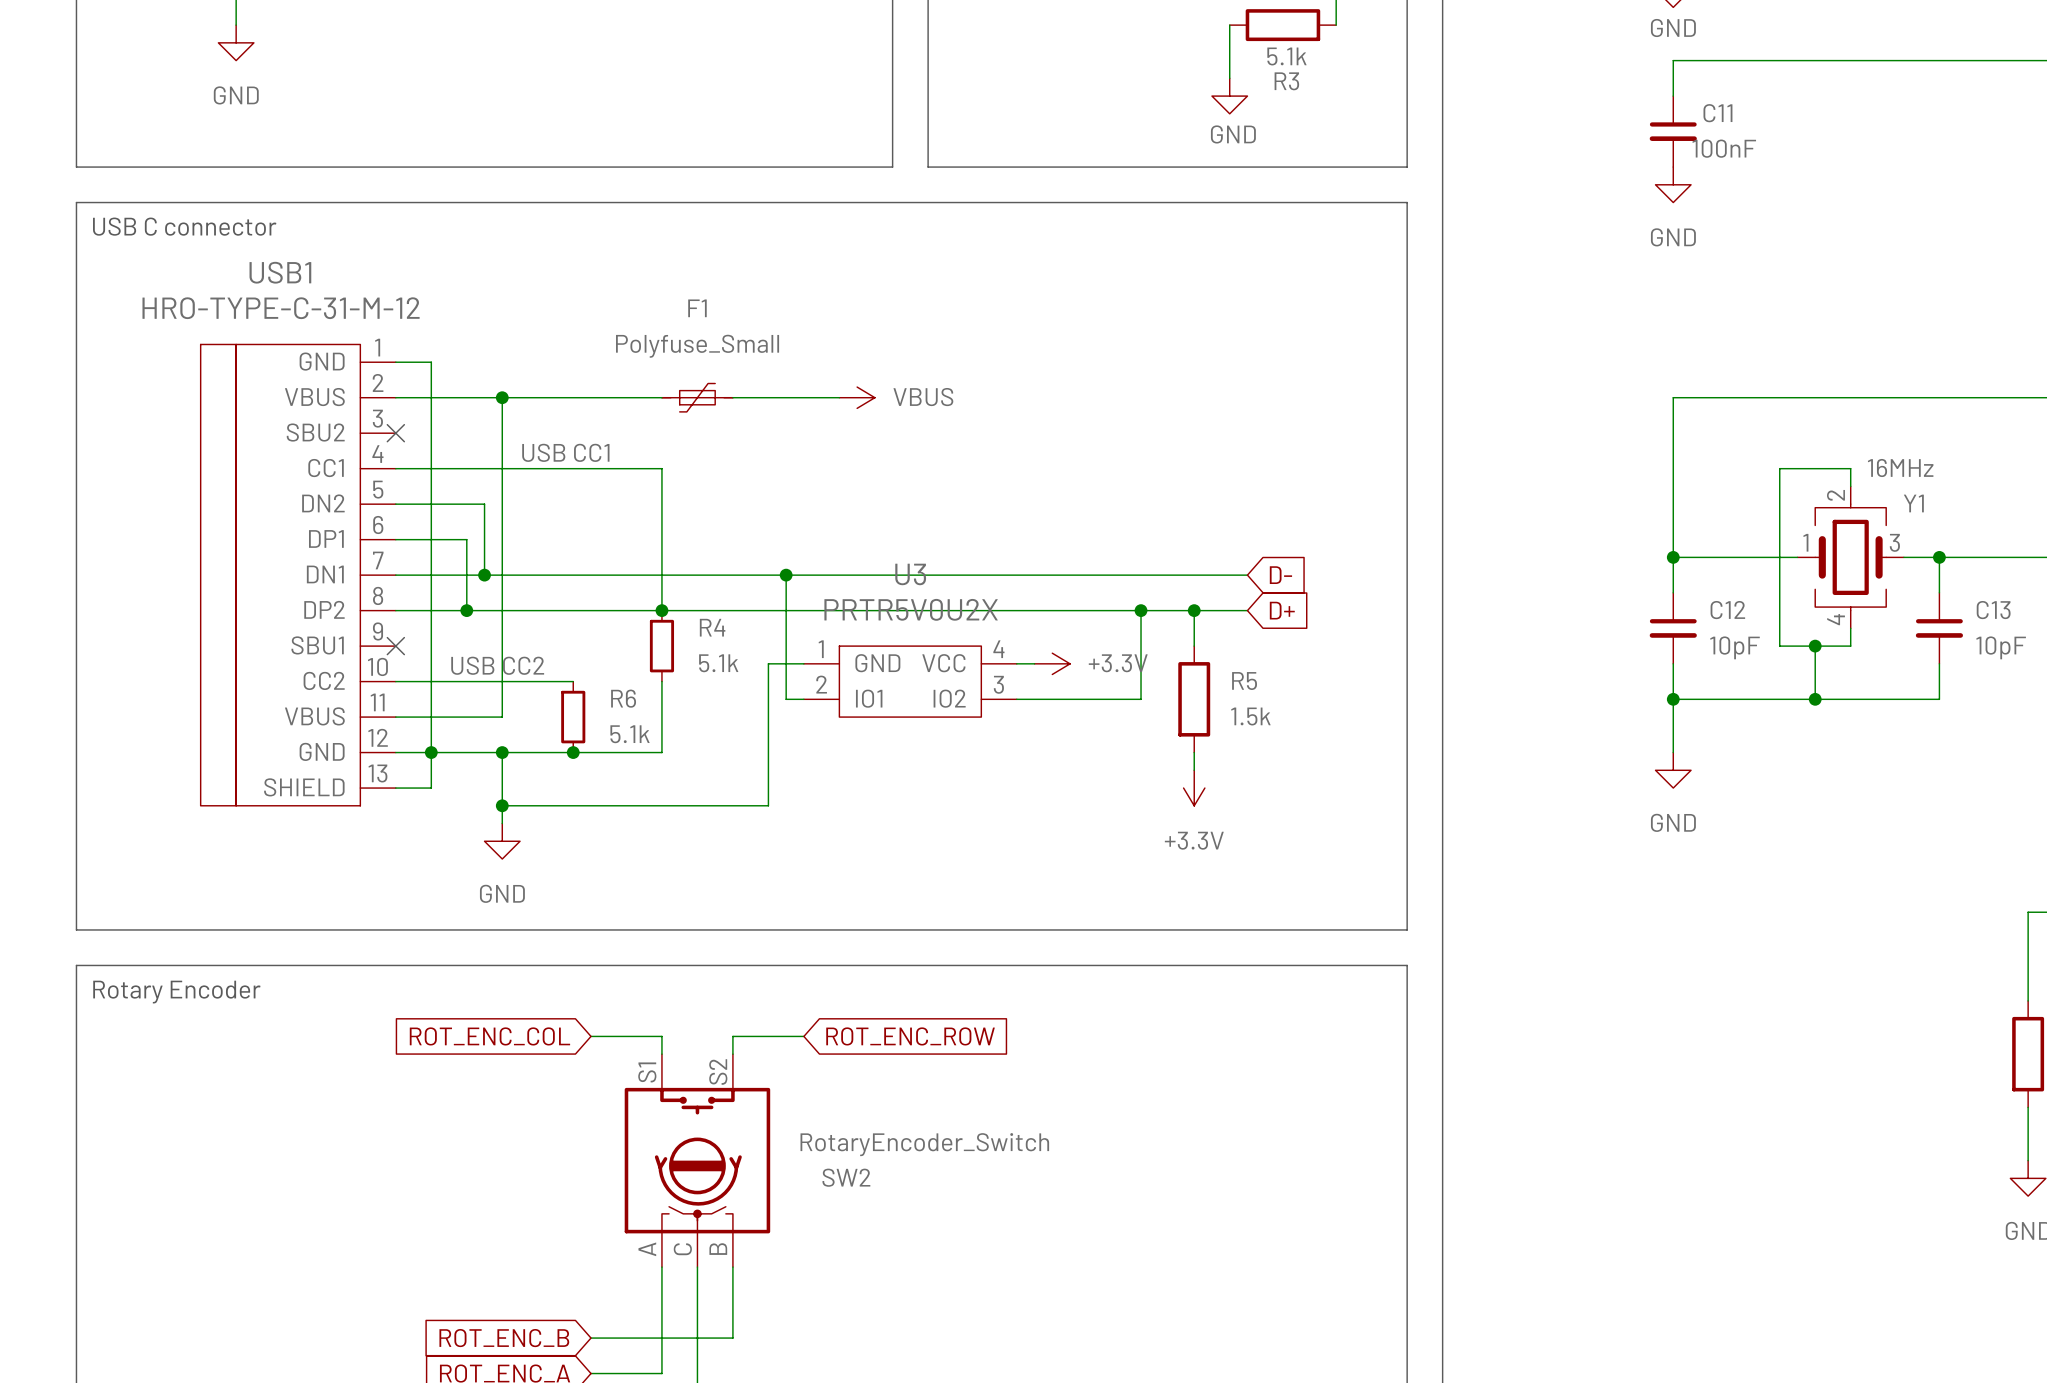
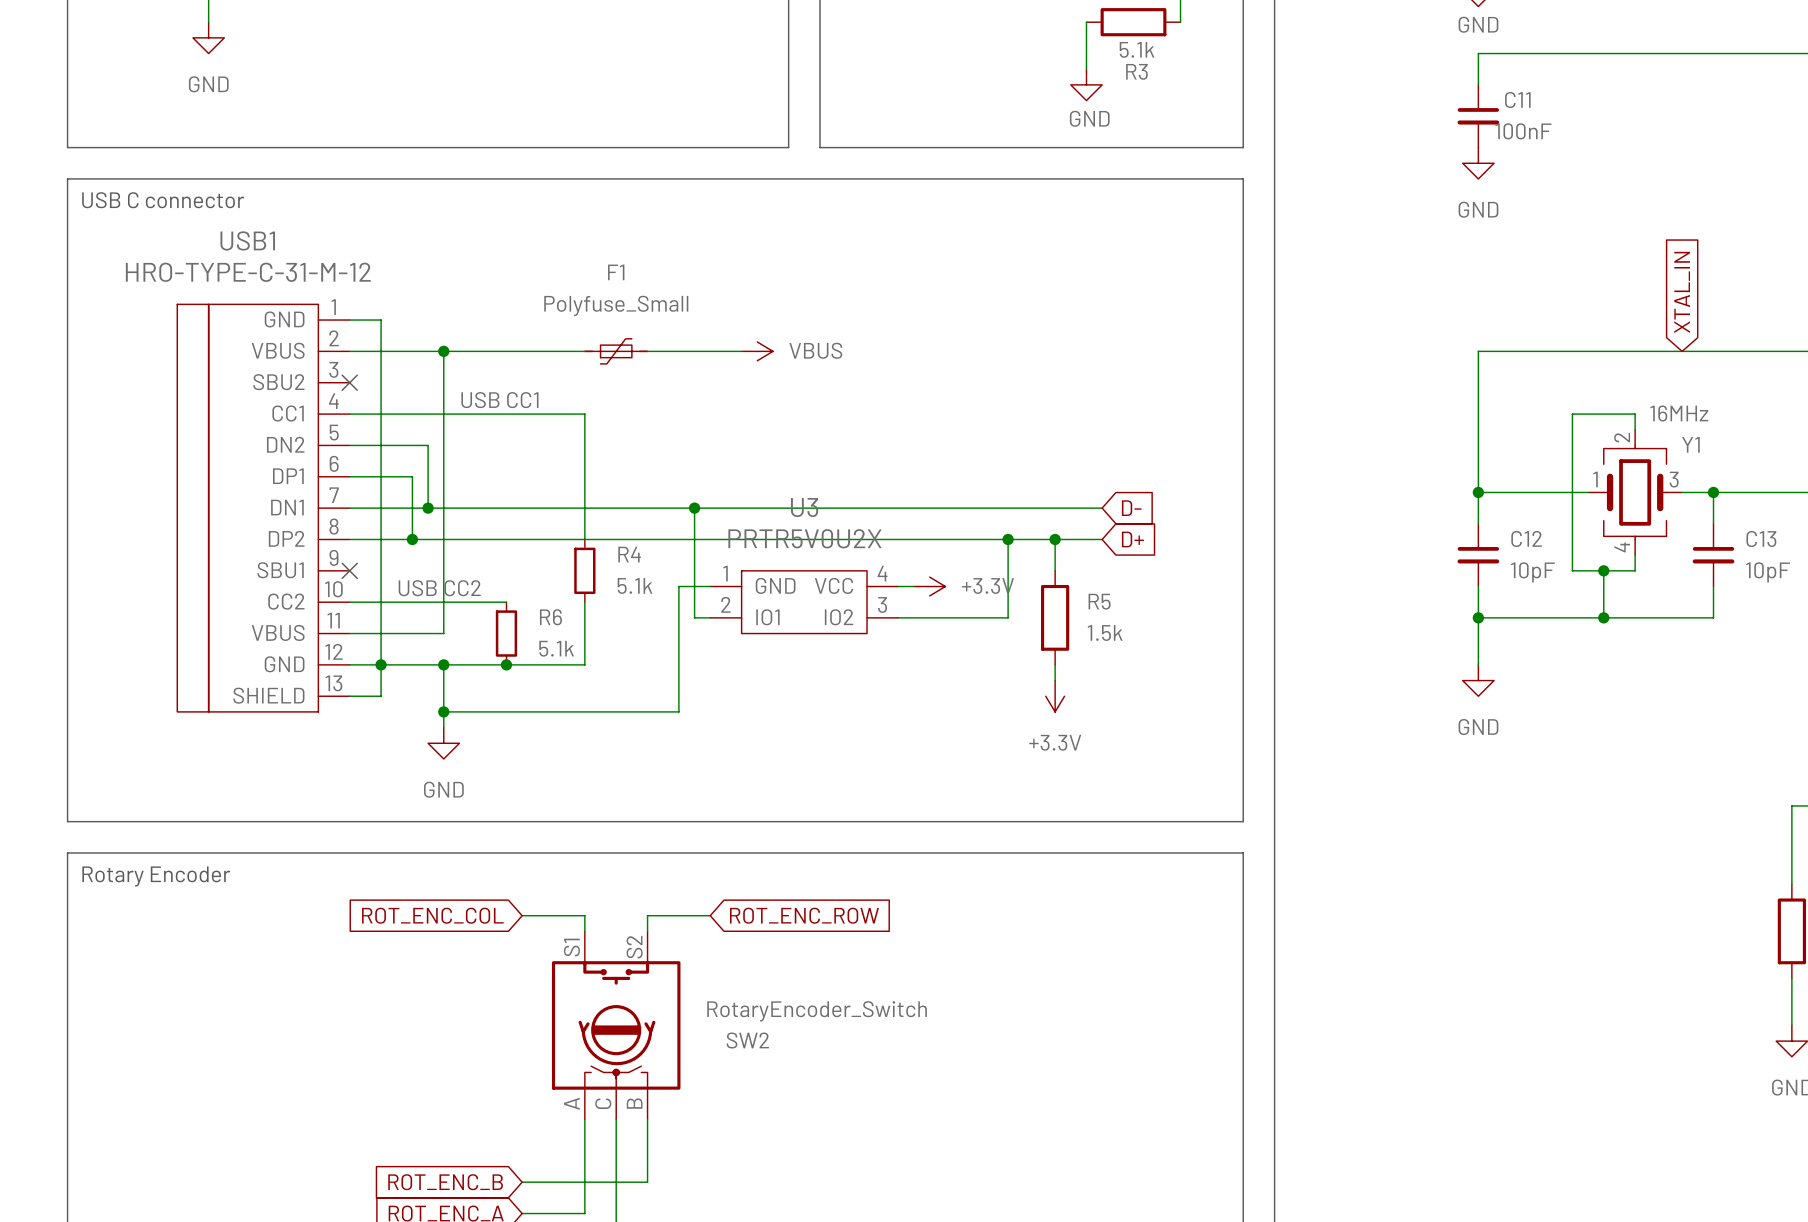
global label: none -> XTAL_IN (1682, 292)
junction: (661, 610) -> none

